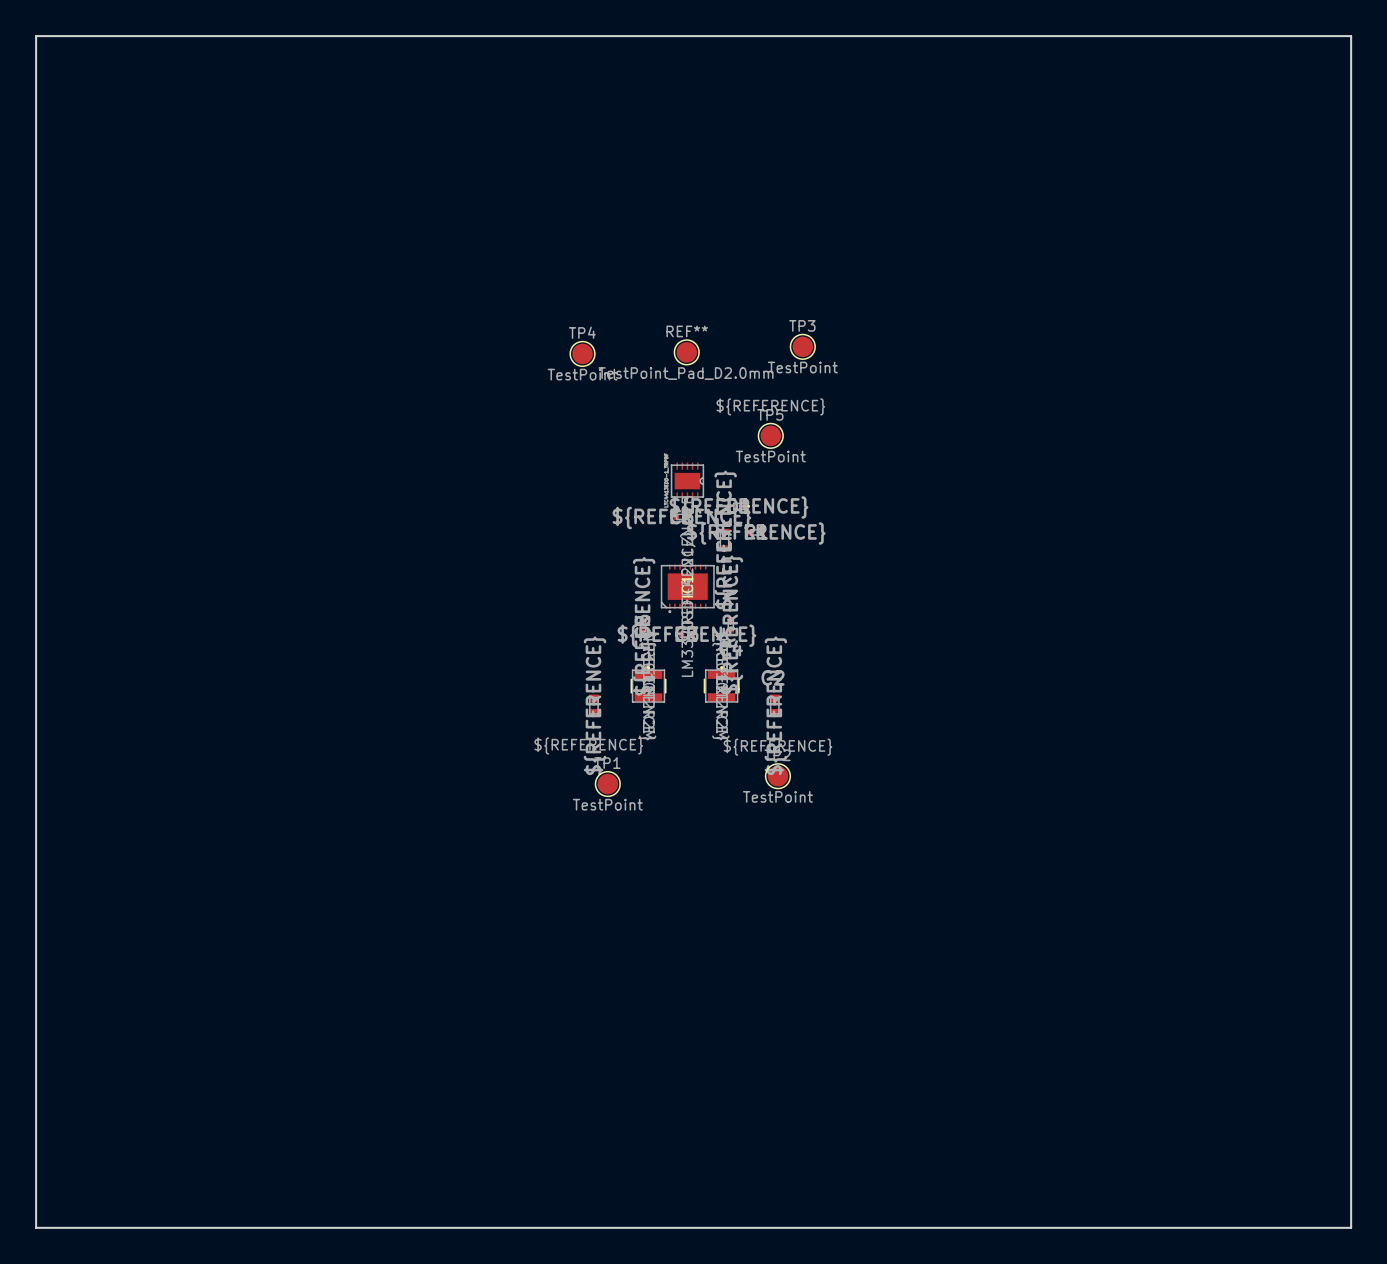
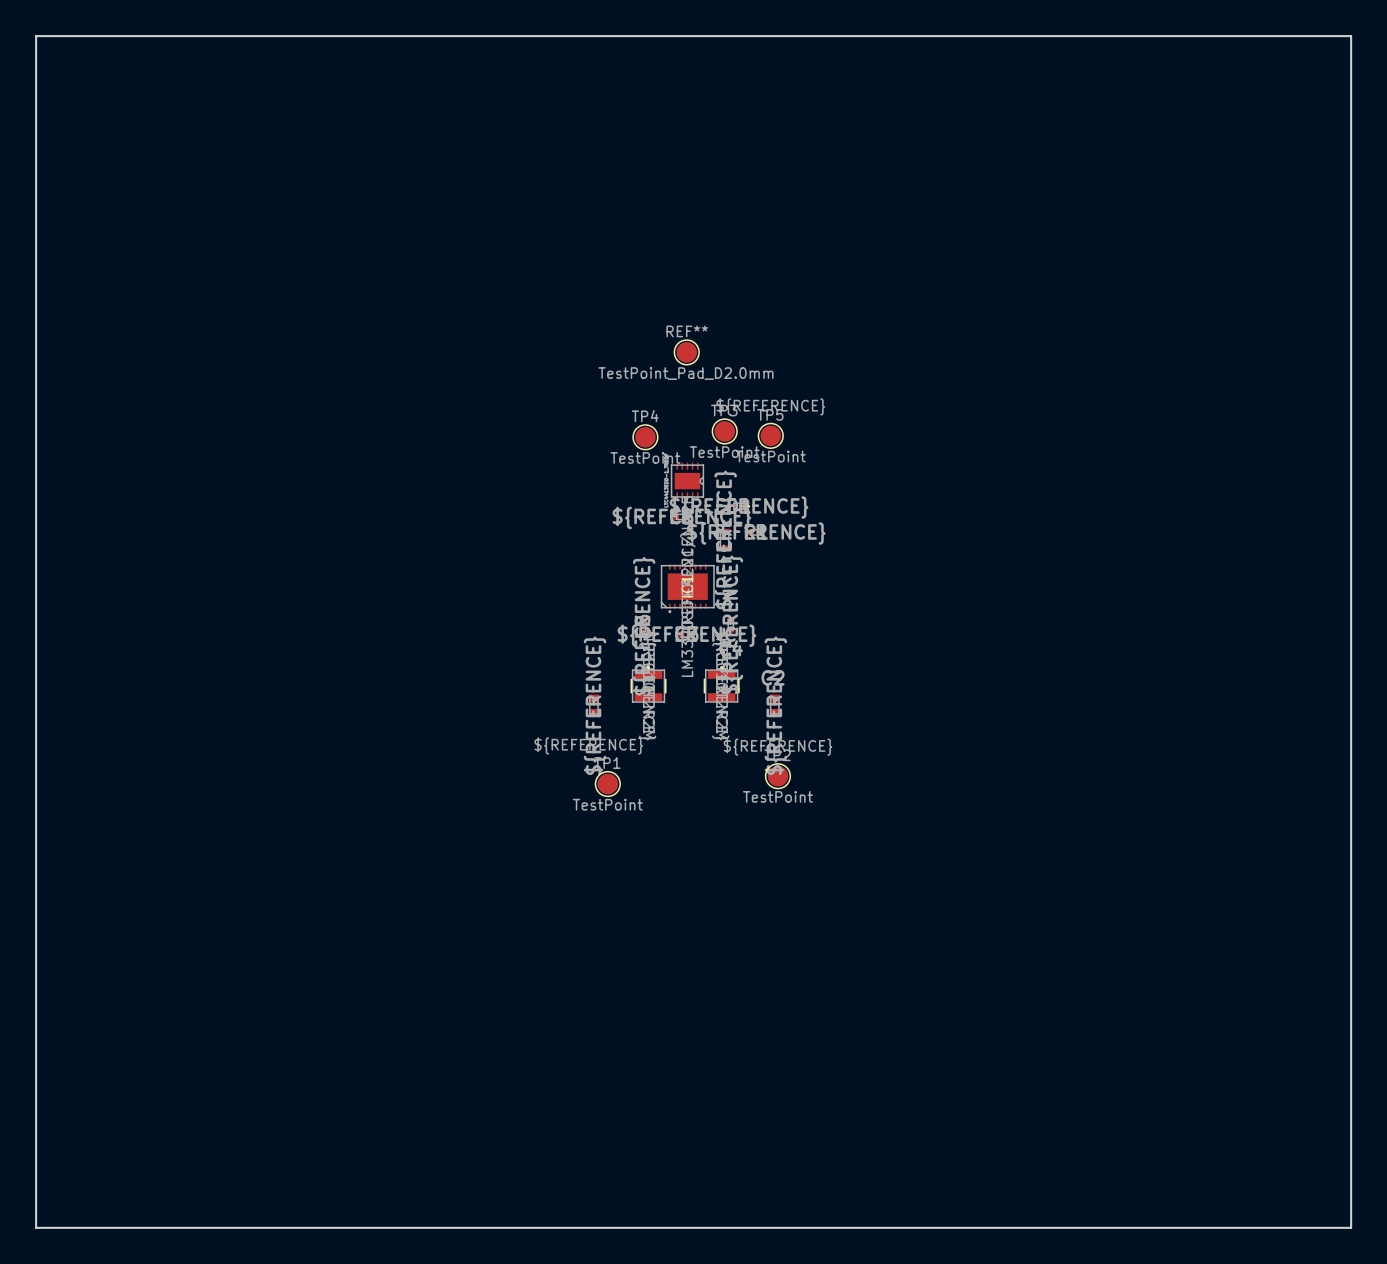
TP3 position: (802, 346) -> (724, 431)
TP4 position: (582, 353) -> (645, 437)

